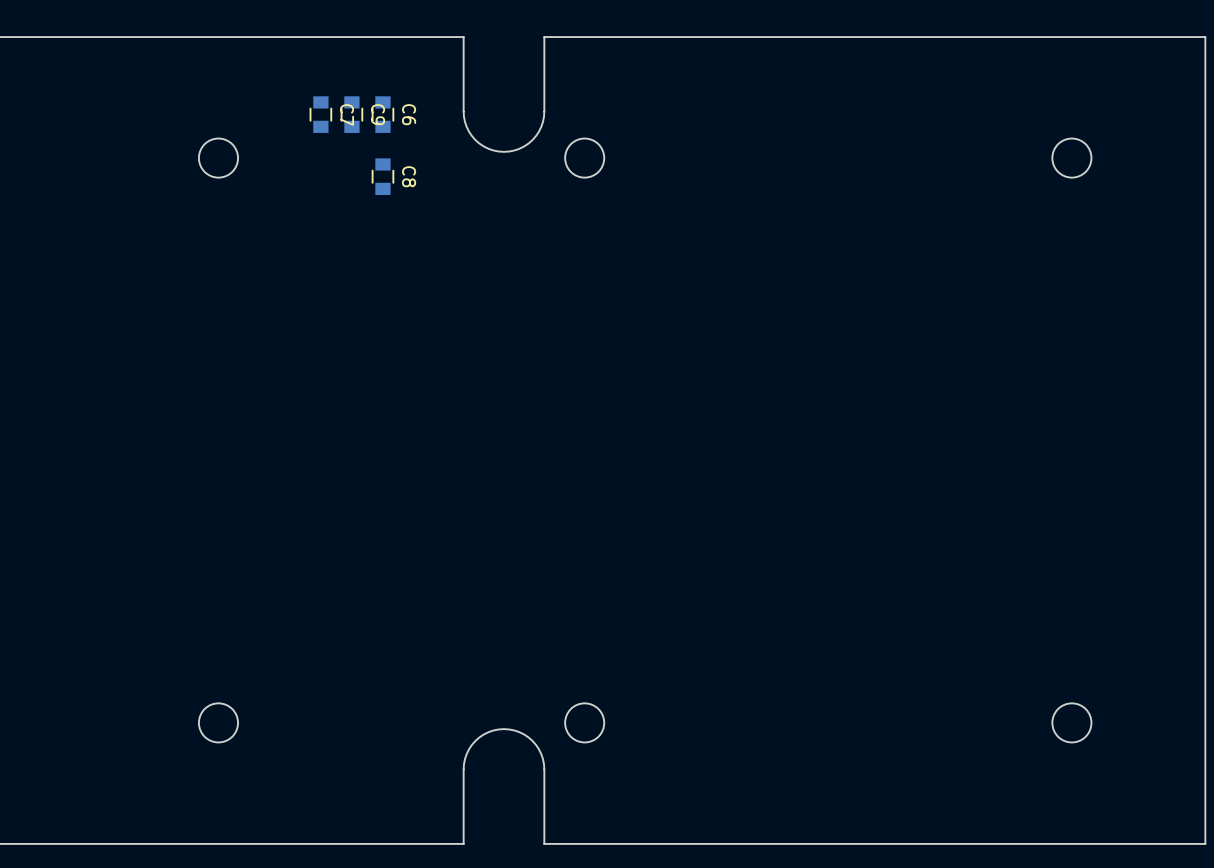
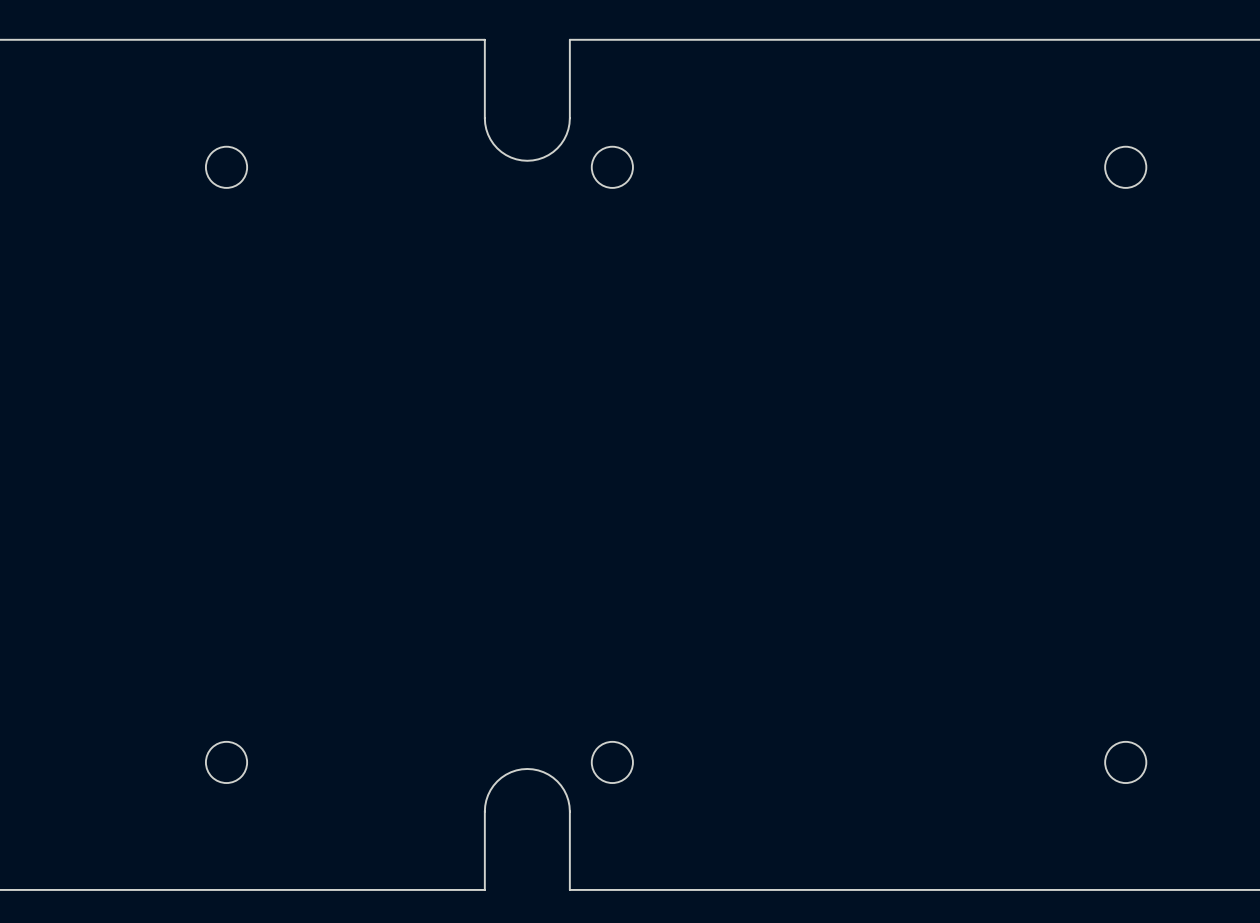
C7: (320, 114) -> none
C9: (351, 114) -> none
C6: (382, 114) -> none
C8: (382, 176) -> none

